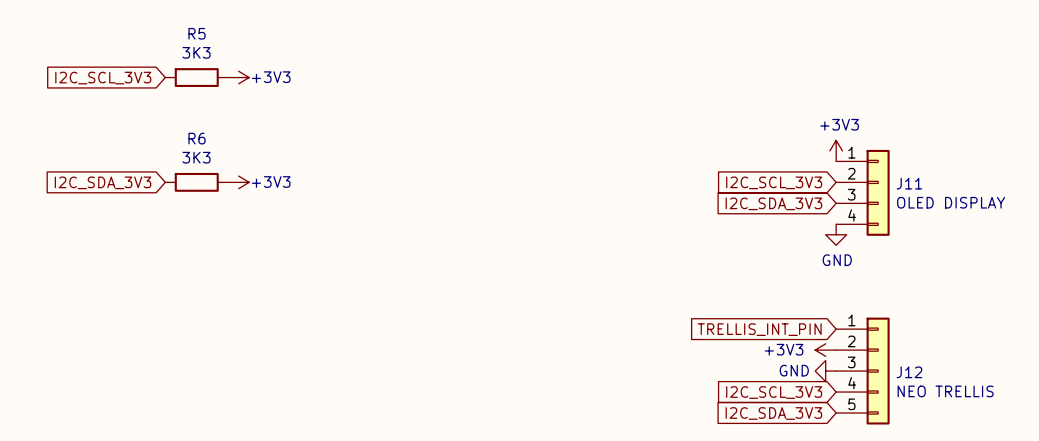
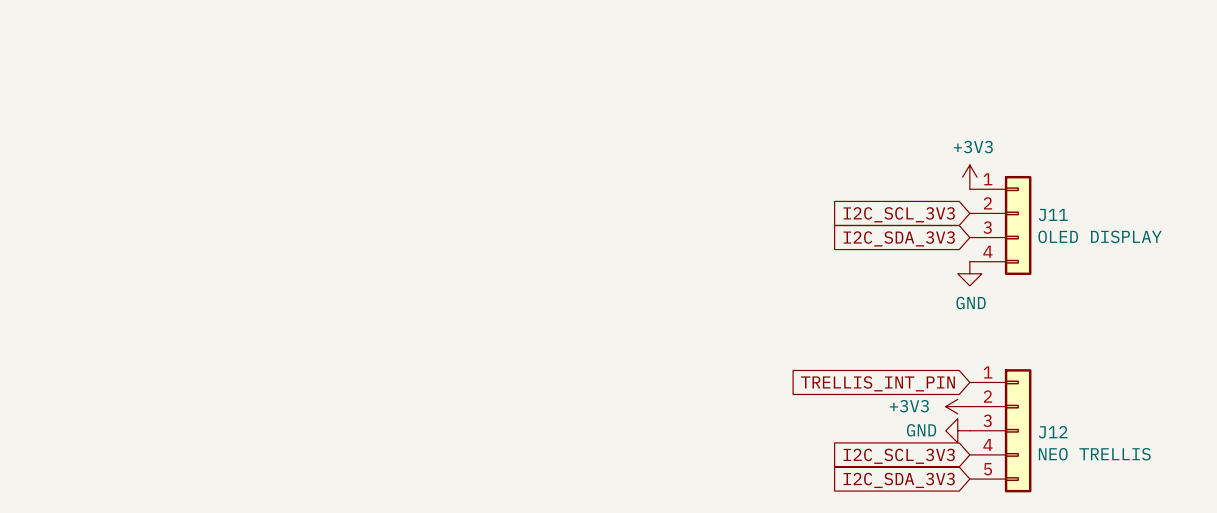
R5: 3K3 (196, 77) -> none
power symbol: +3V3 (238, 77) -> none
global label: I2C_SCL_3V3 (103, 78) -> none
global label: I2C_SDA_3V3 (103, 182) -> none
R6: 3K3 (196, 182) -> none
power symbol: +3V3 (238, 182) -> none

